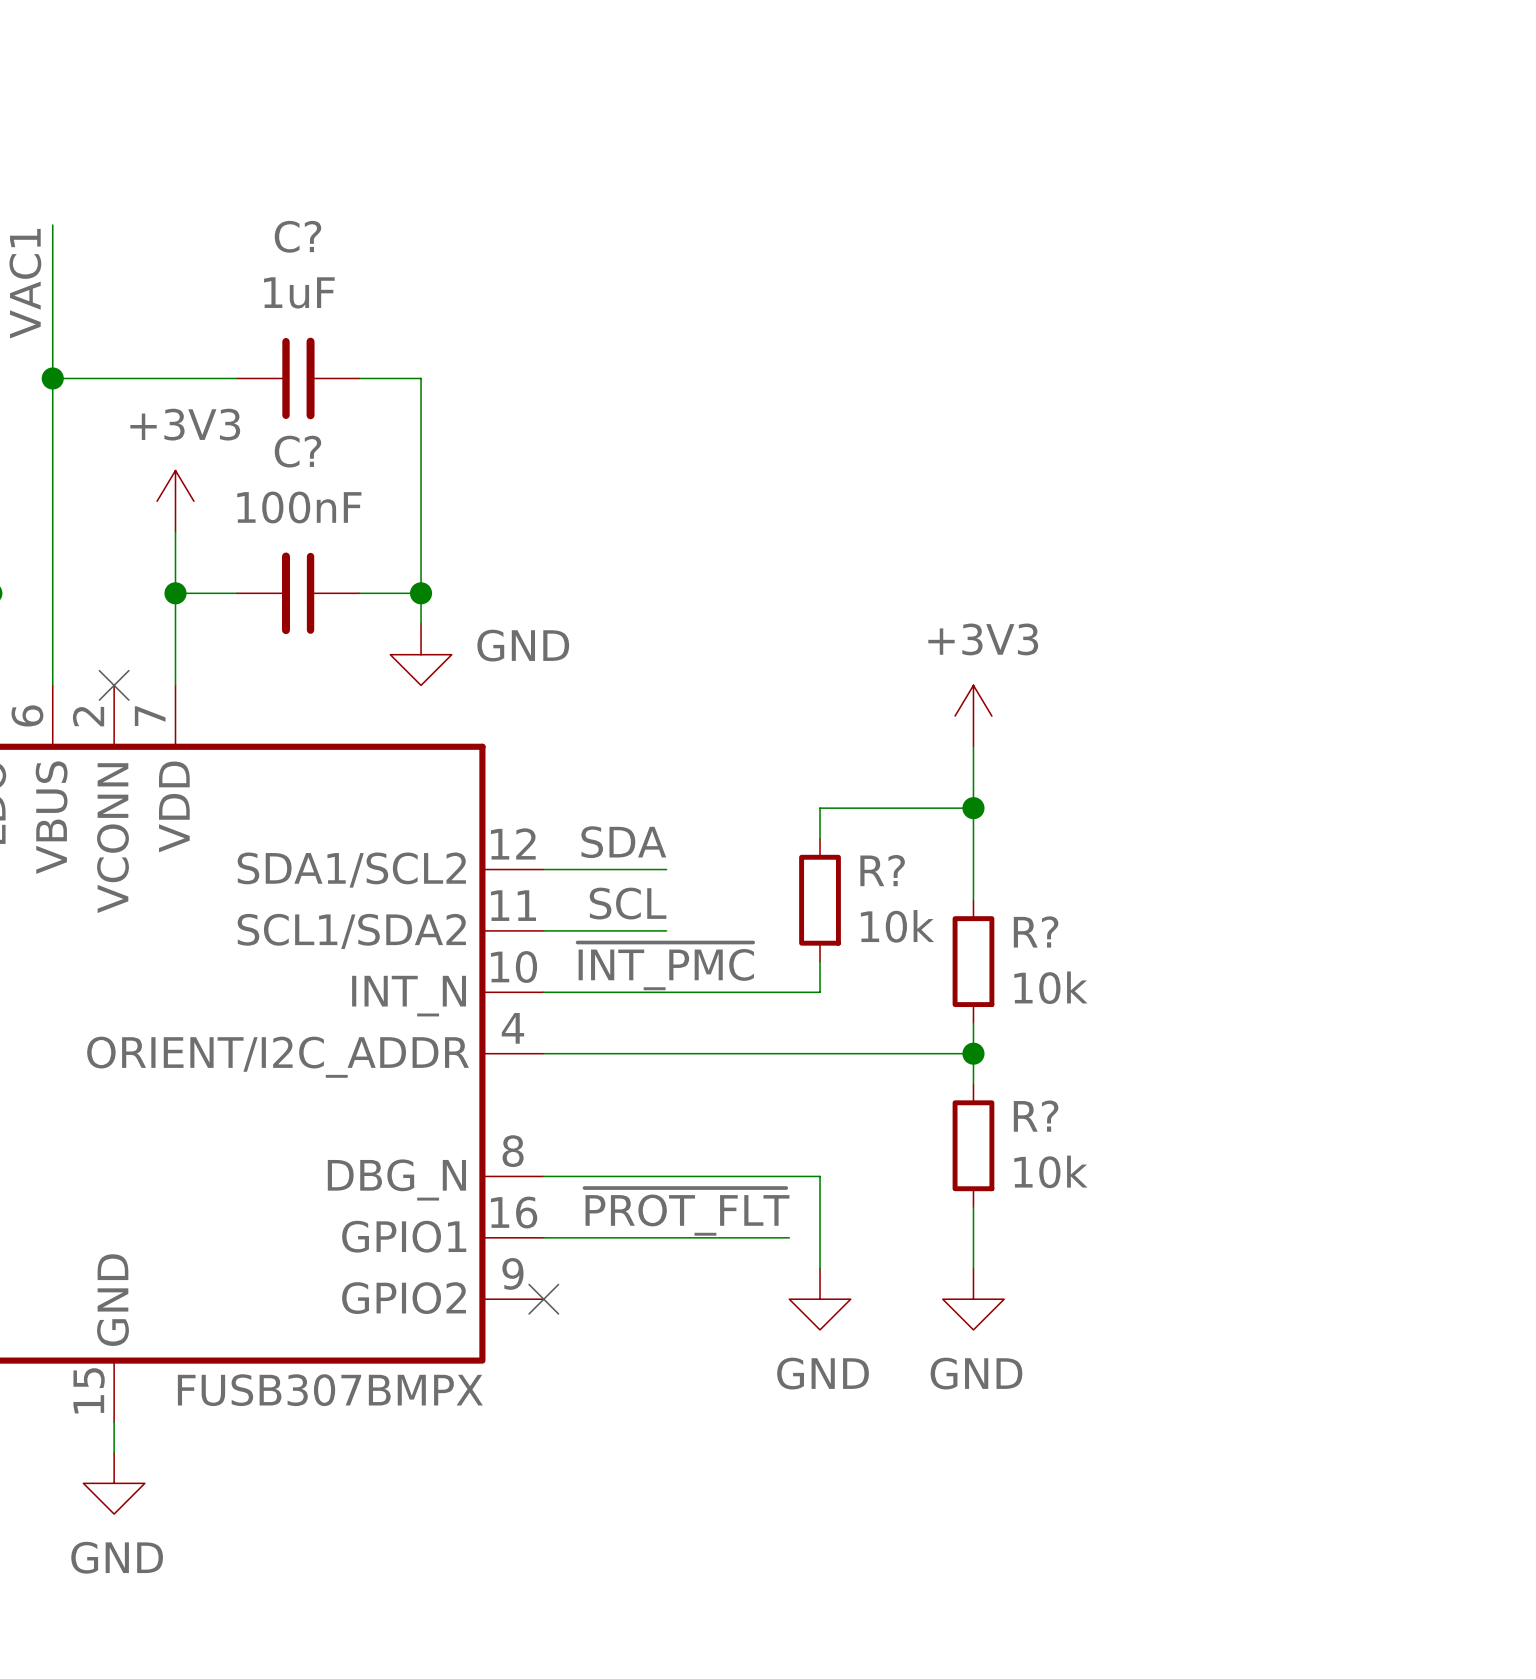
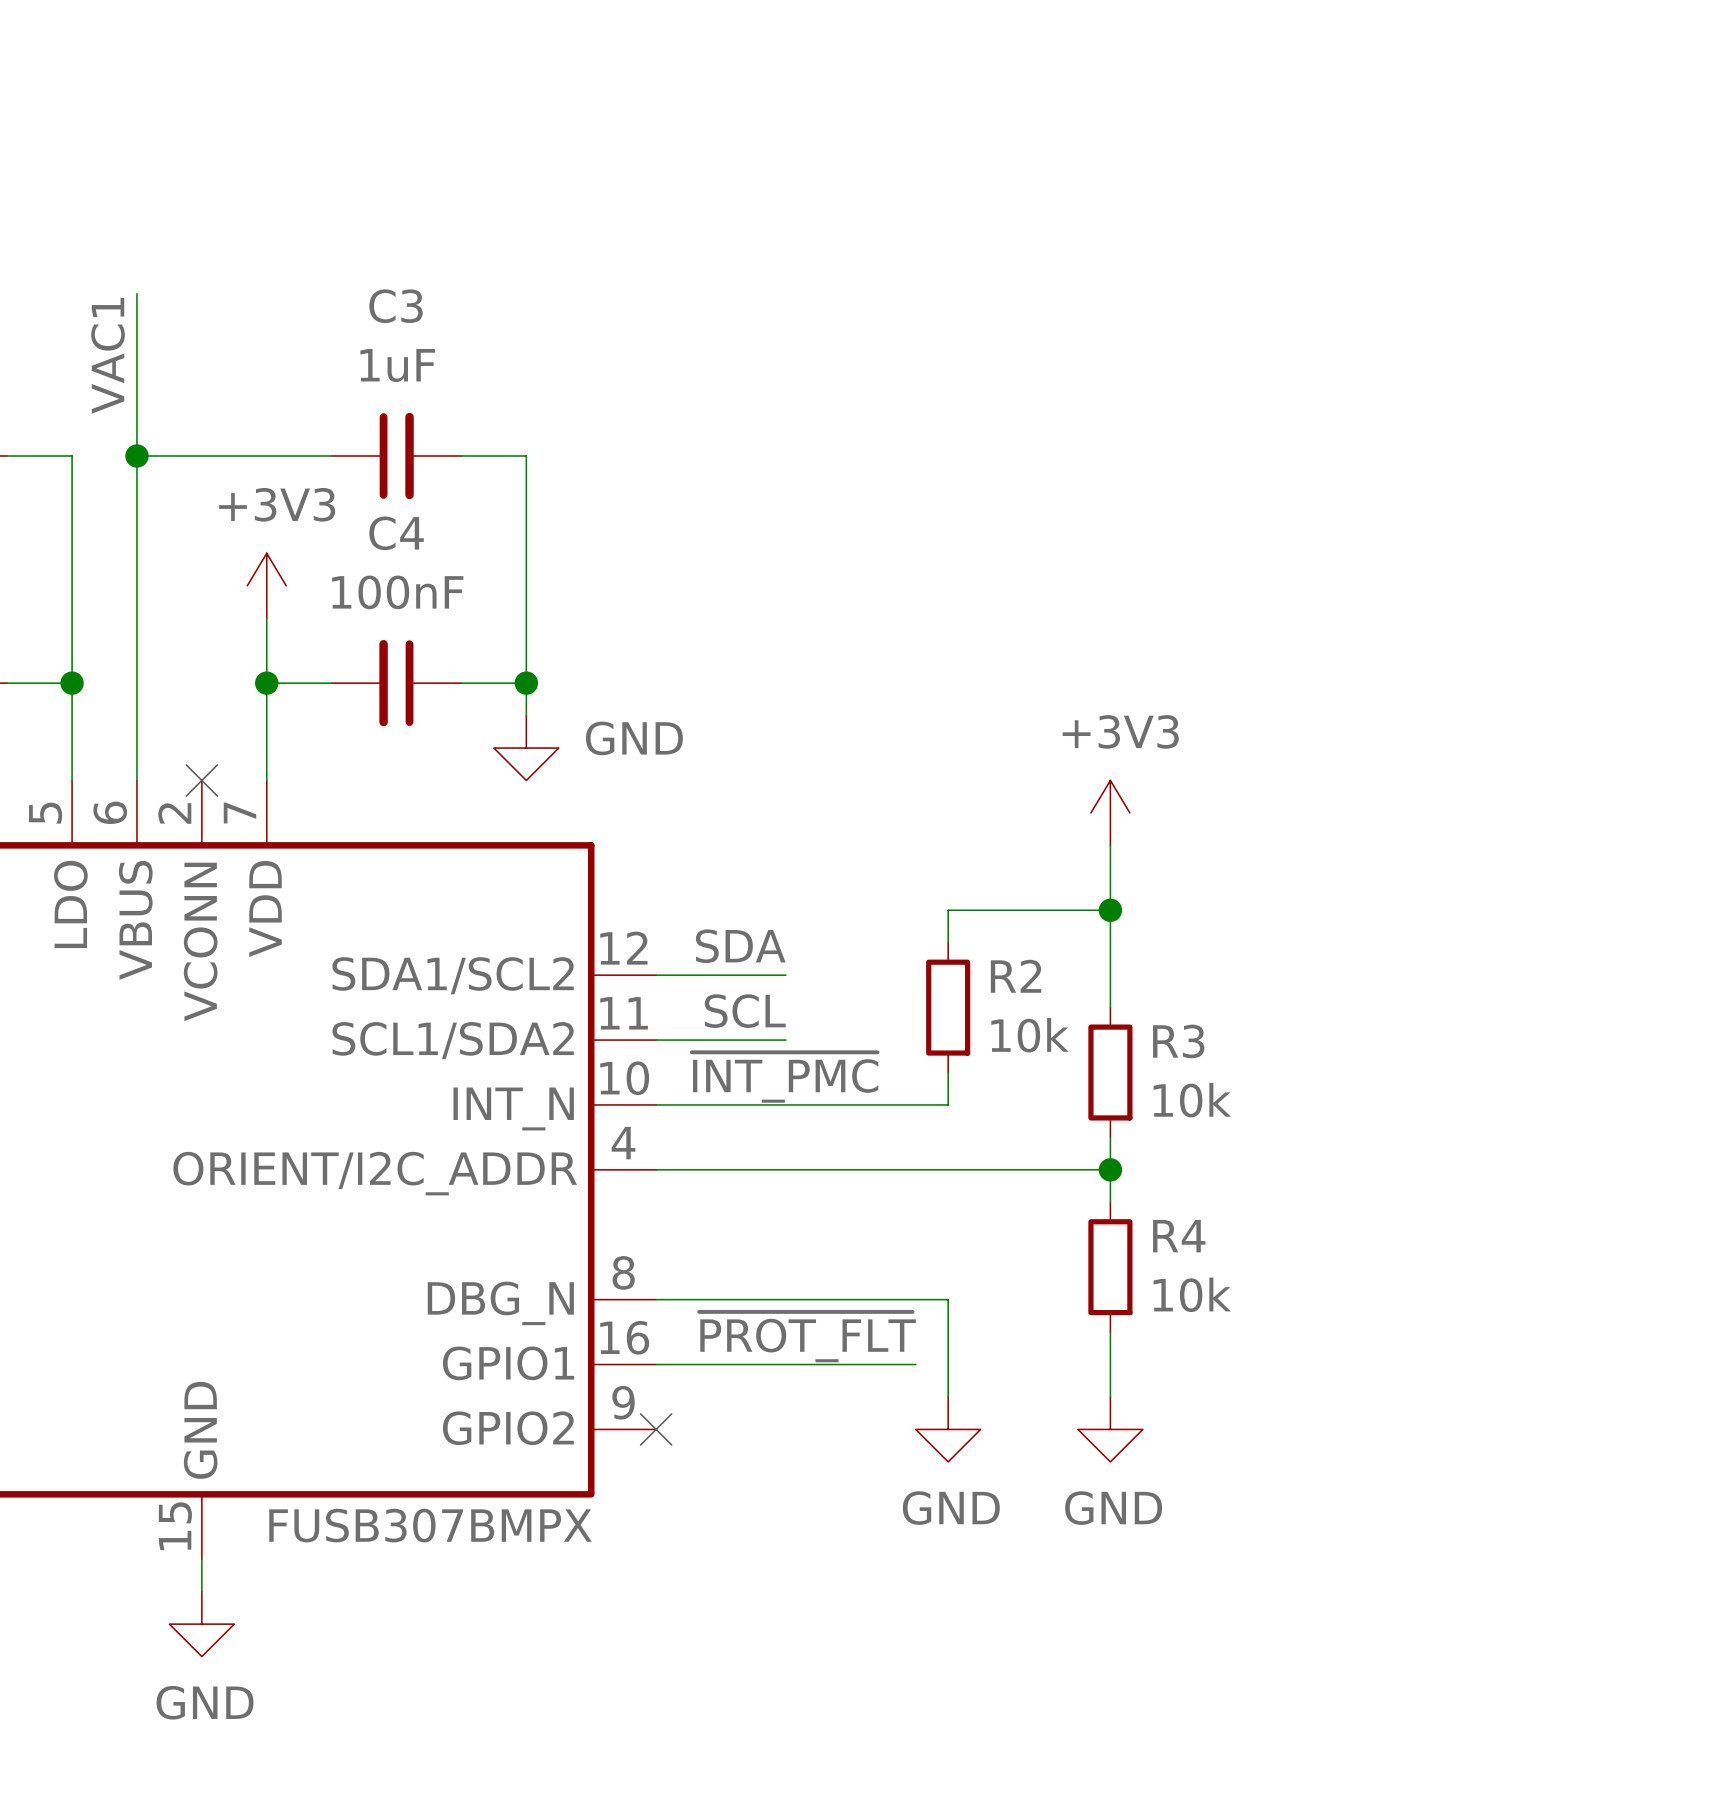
C? name: C? (297, 236) -> C3 (396, 306)
C? name: C? (297, 451) -> C4 (396, 533)
R? name: R? (882, 870) -> R2 (1016, 976)
R? name: R? (1036, 931) -> R3 (1178, 1041)
R? name: R? (1036, 1116) -> R4 (1179, 1236)

